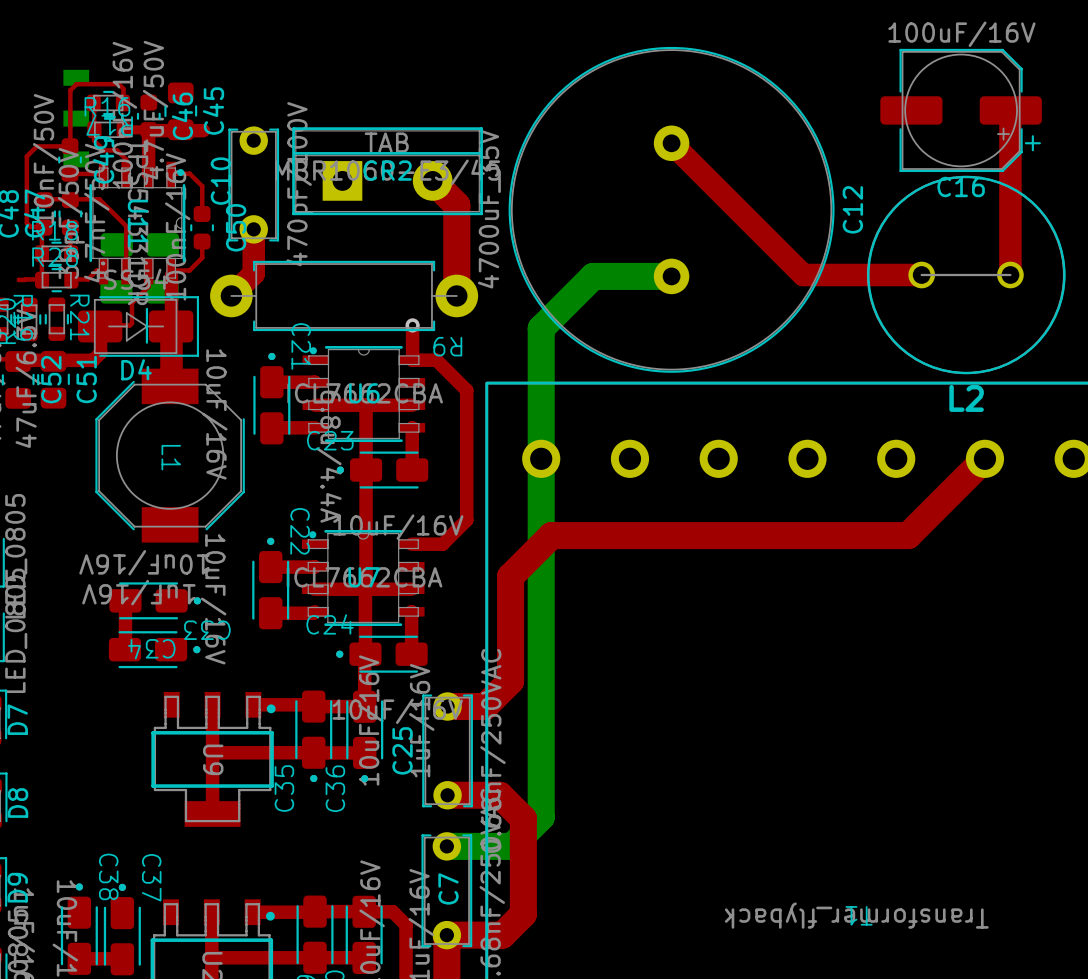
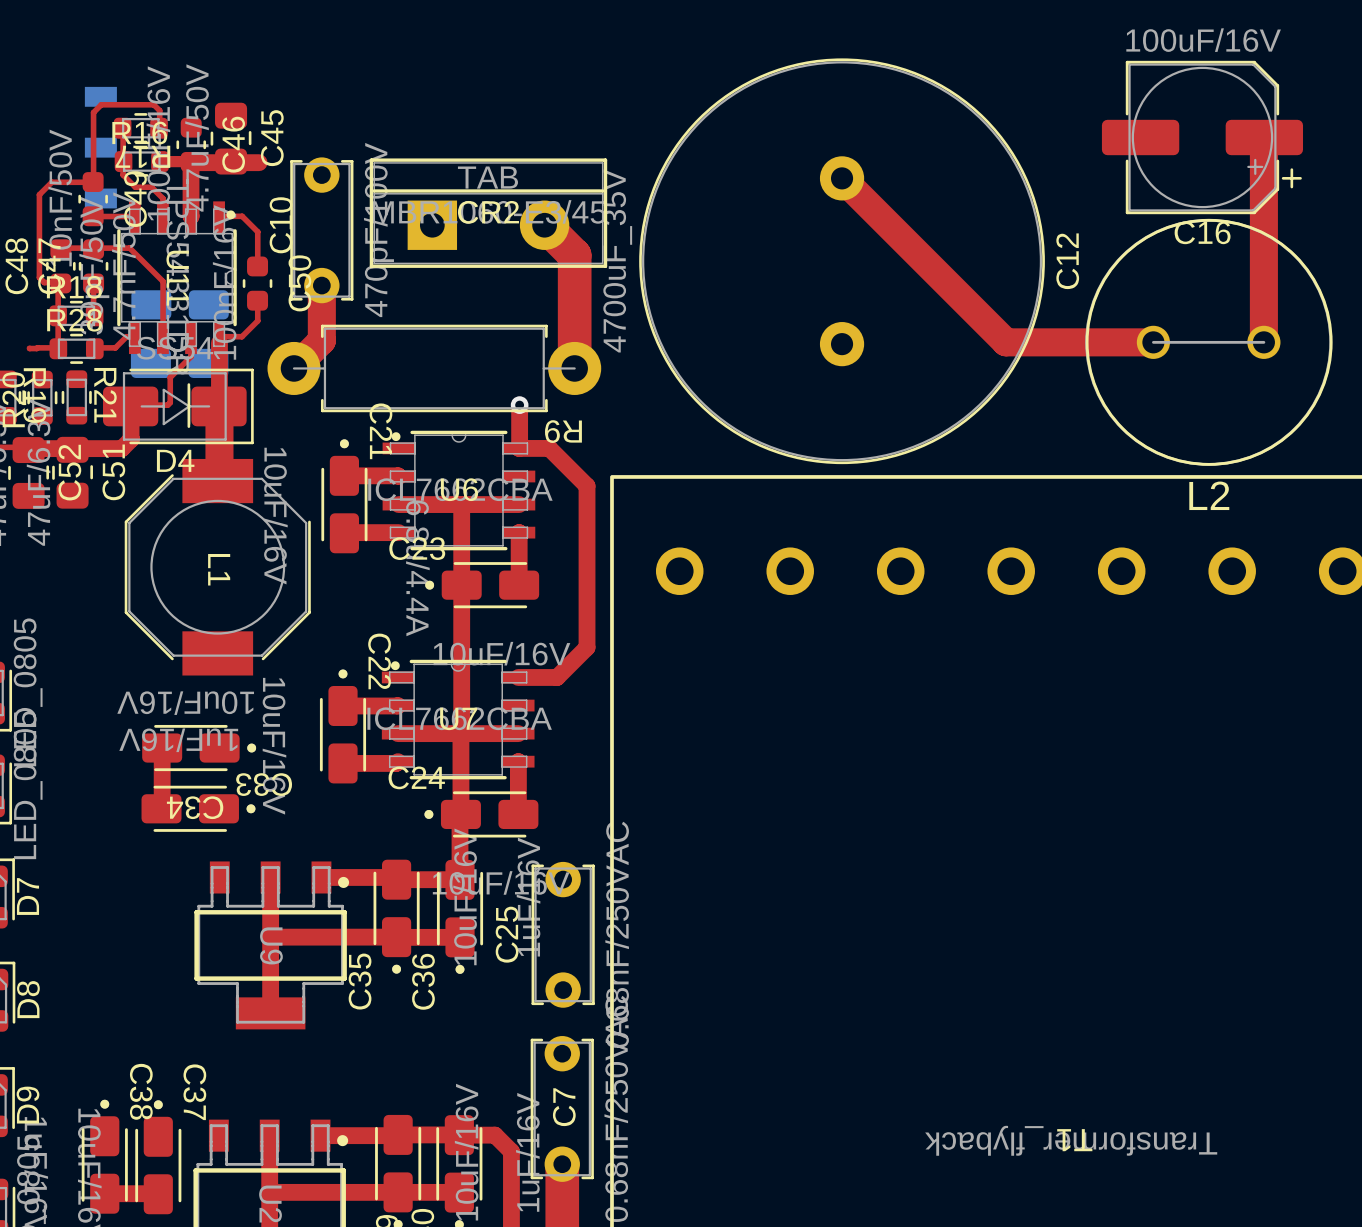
bottom track: (671, 276) (593, 276) (541, 328) (541, 817) (512, 846) (446, 846) -> none
top track: (984, 458) (908, 535) (551, 535) (510, 576) (510, 681) (485, 706) (447, 706) -> none
top track: (447, 795) (499, 795) (523, 818) (523, 914) (502, 935) (446, 935) -> none

